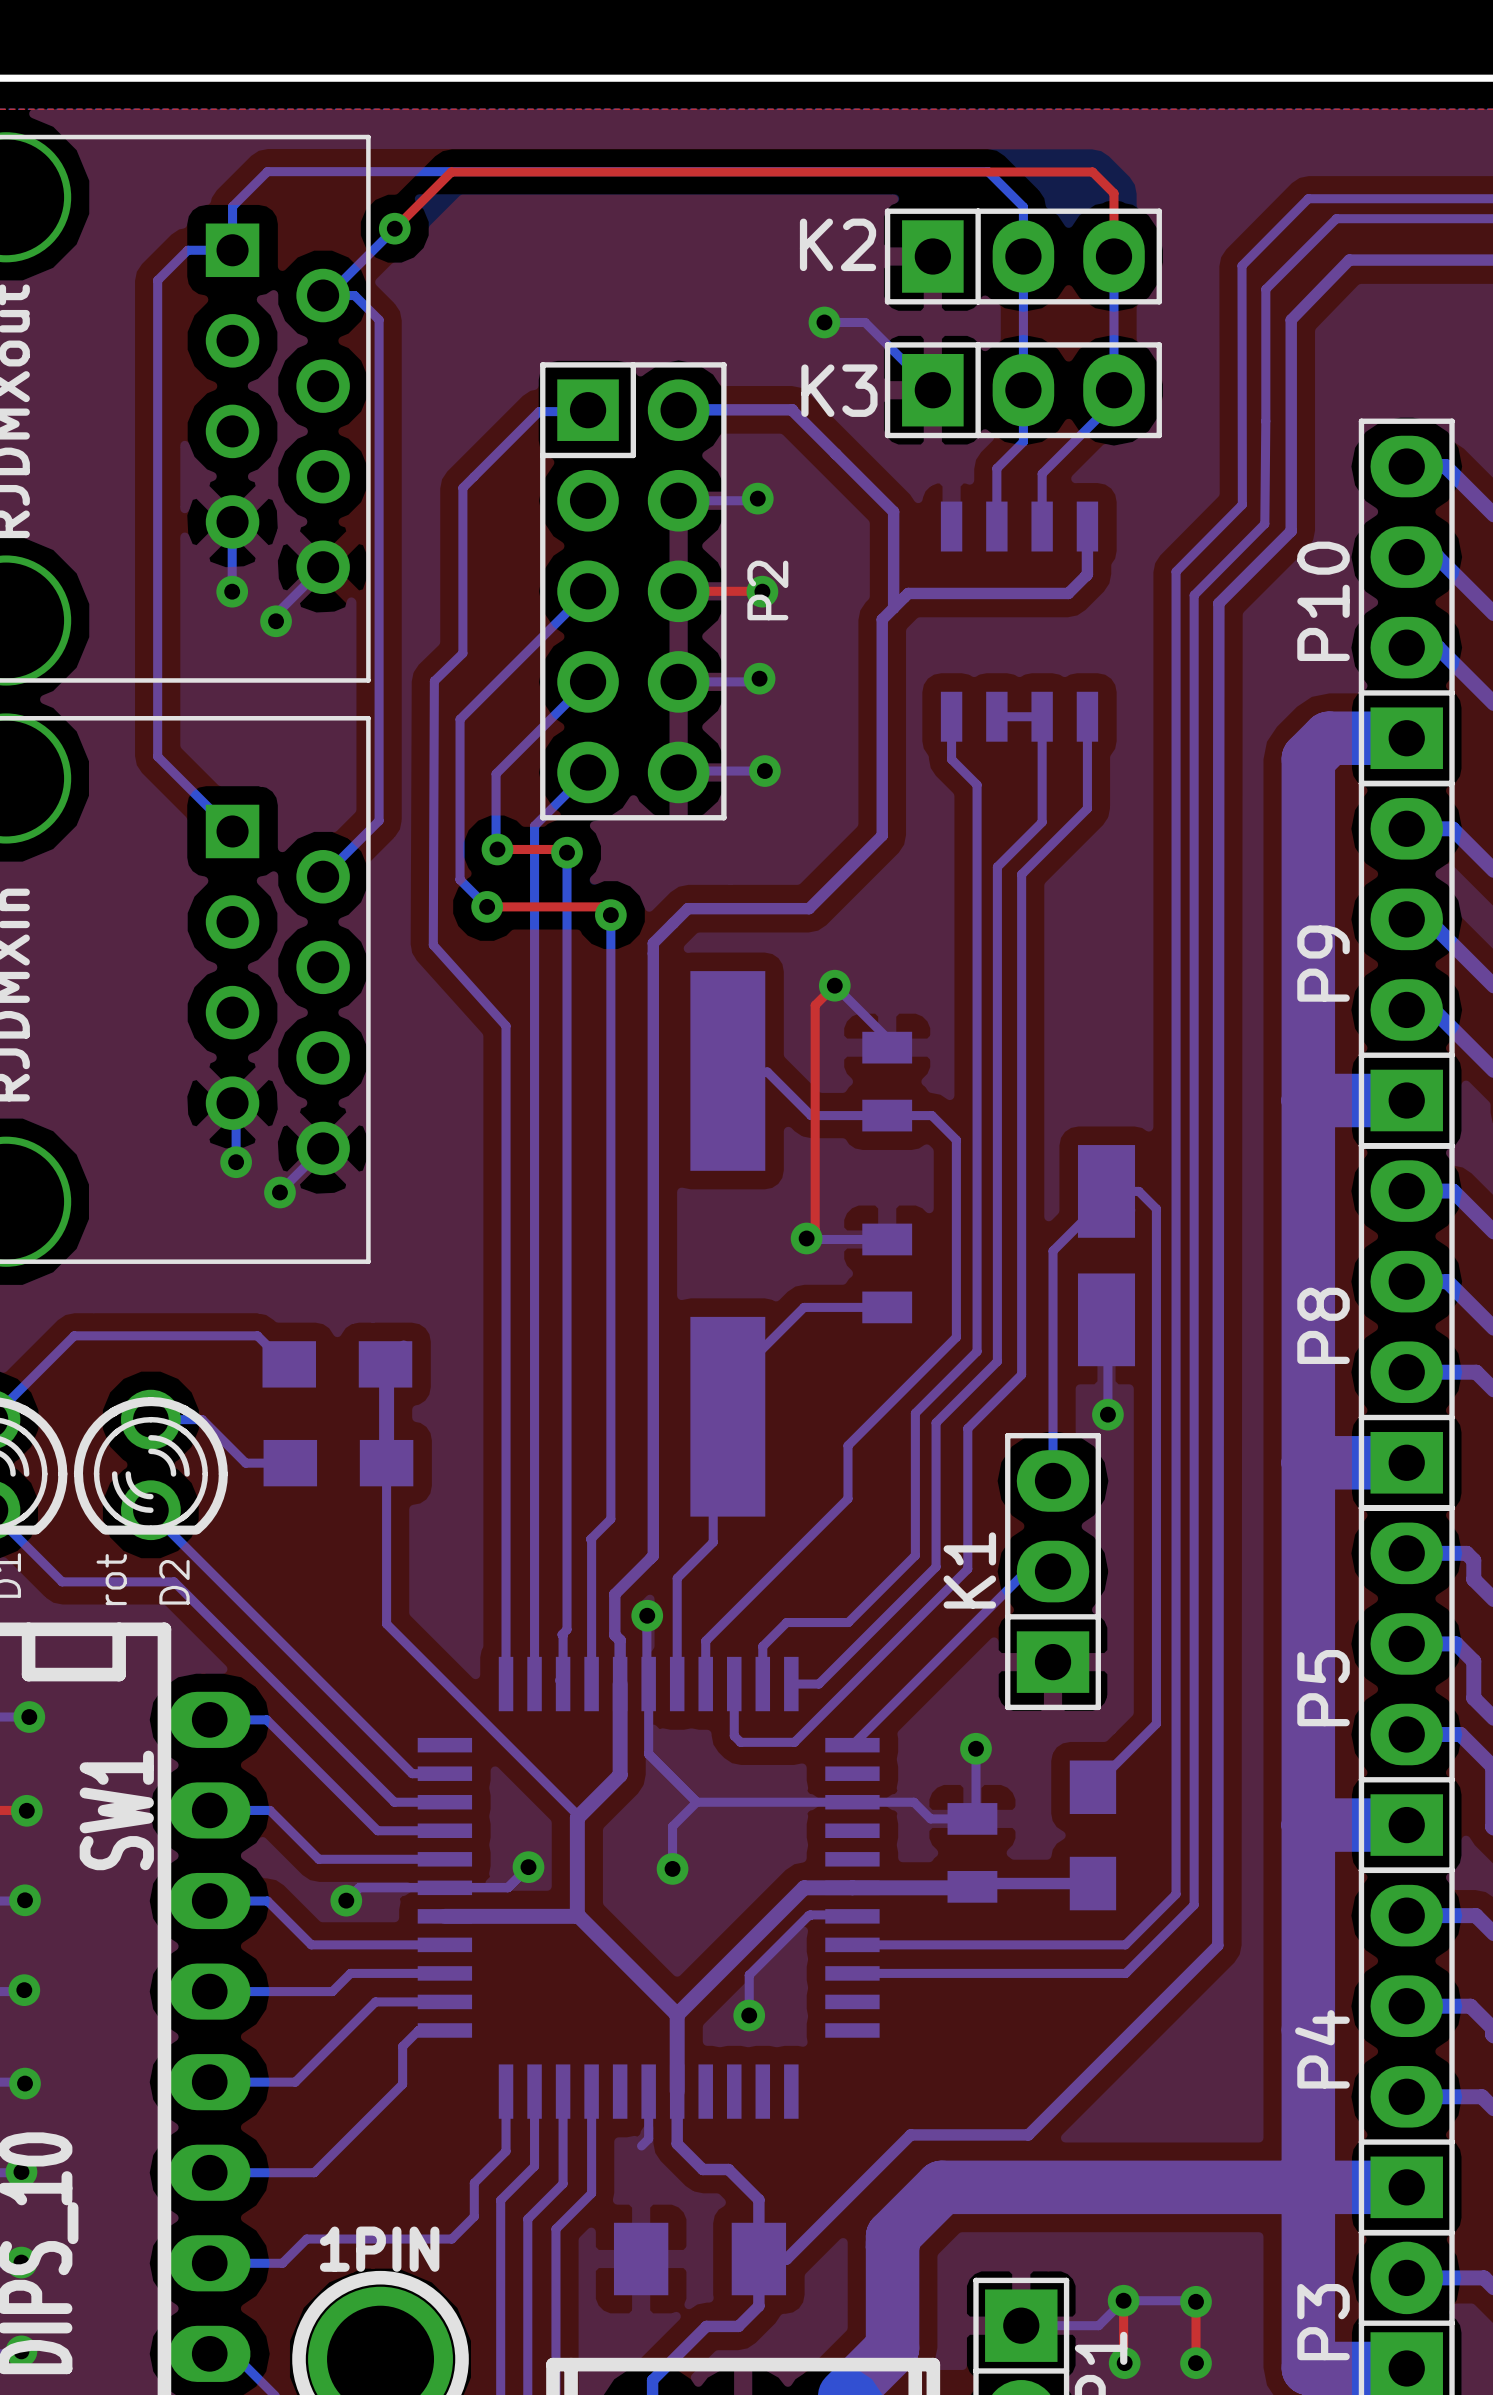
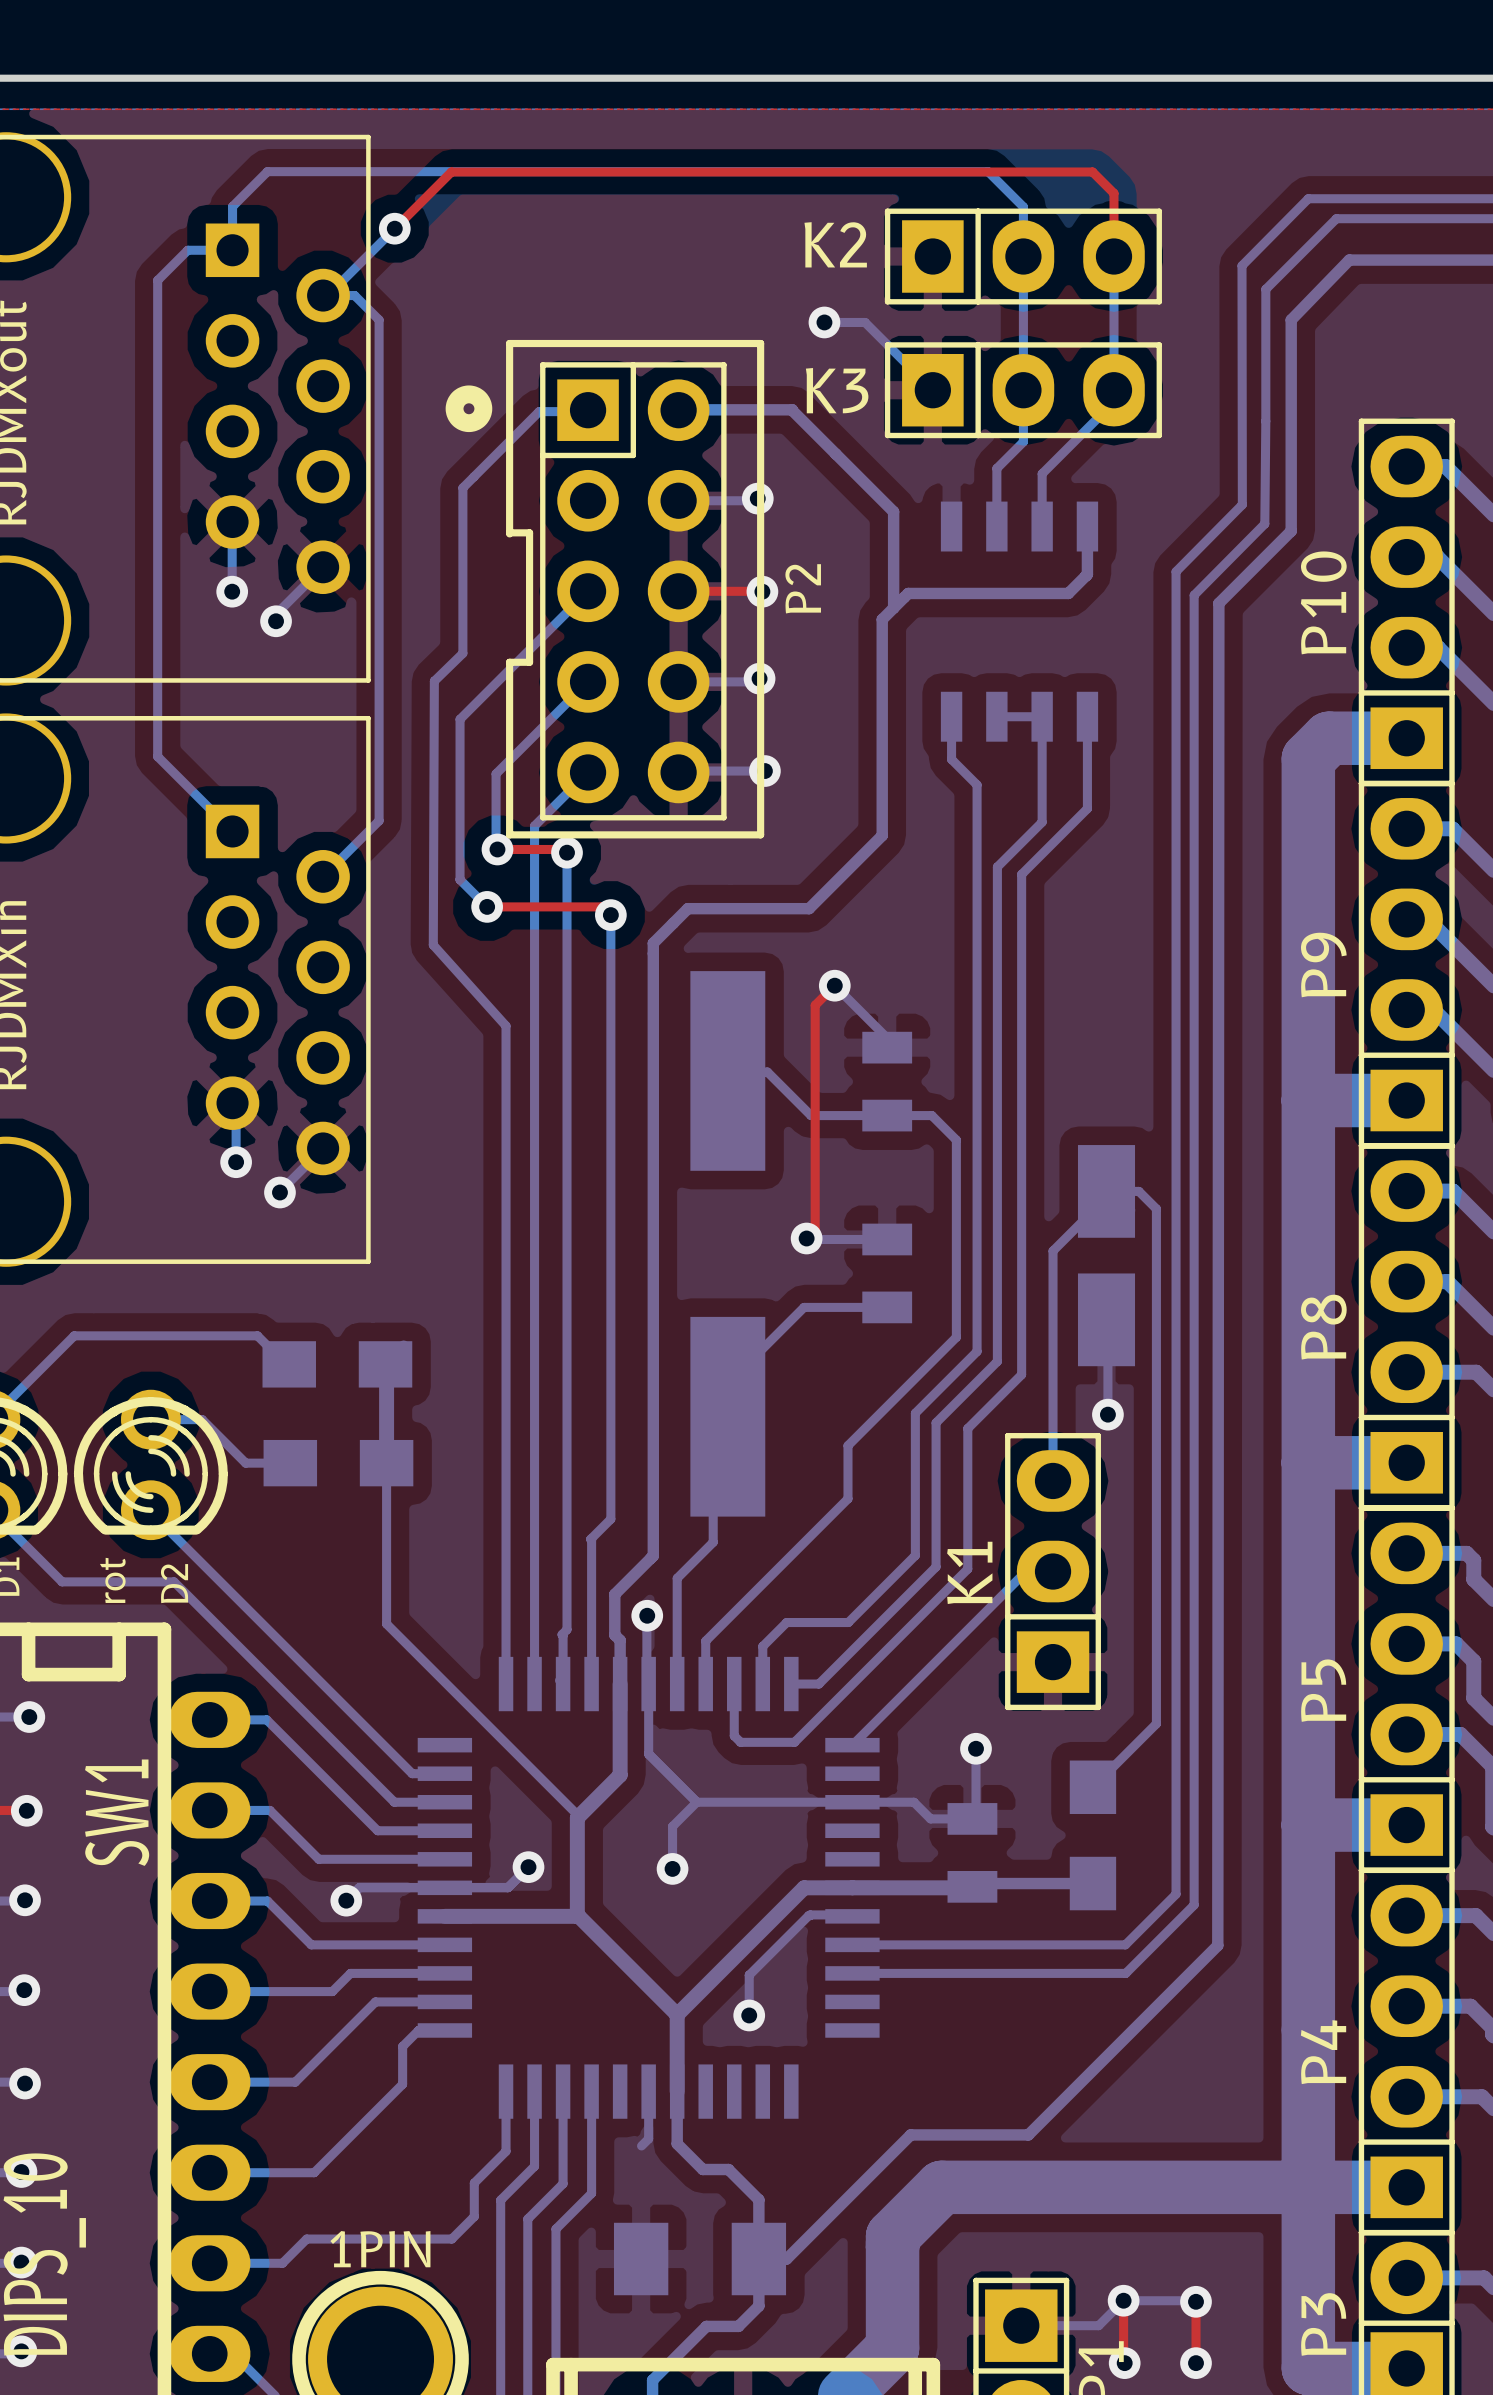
drawing: none -> [445, 385, 493, 433]
line: none -> (509, 532) (529, 532) (529, 662) (509, 662) (509, 834) (760, 834) (760, 343) (509, 343) (509, 533)
P2 name position: P2 (767, 590) -> P2 (803, 588)

